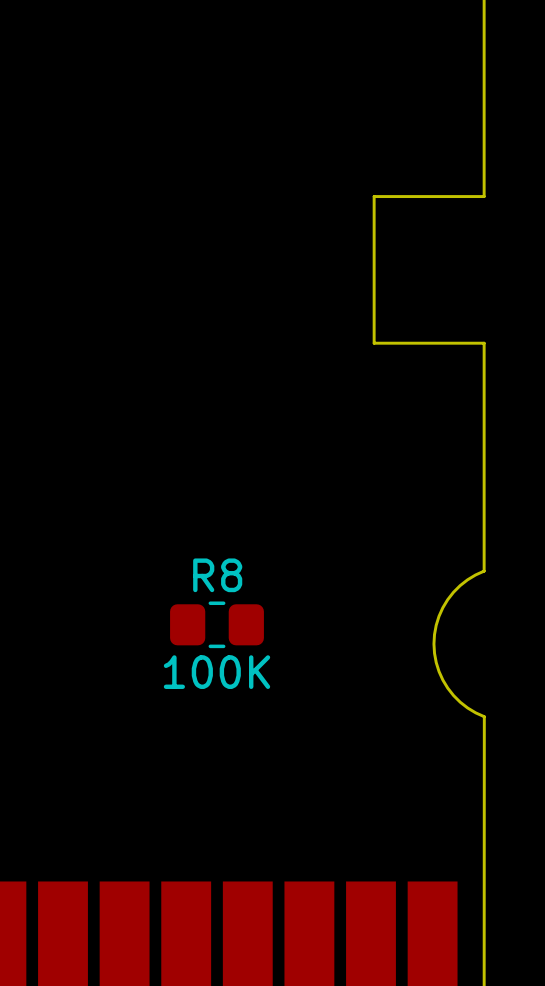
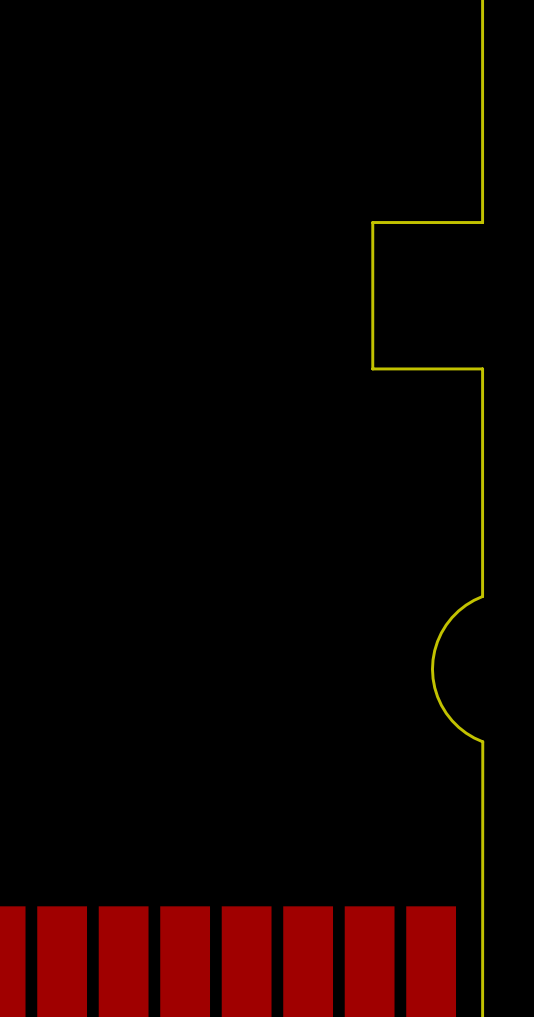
R8: 100K (216, 624) -> none

